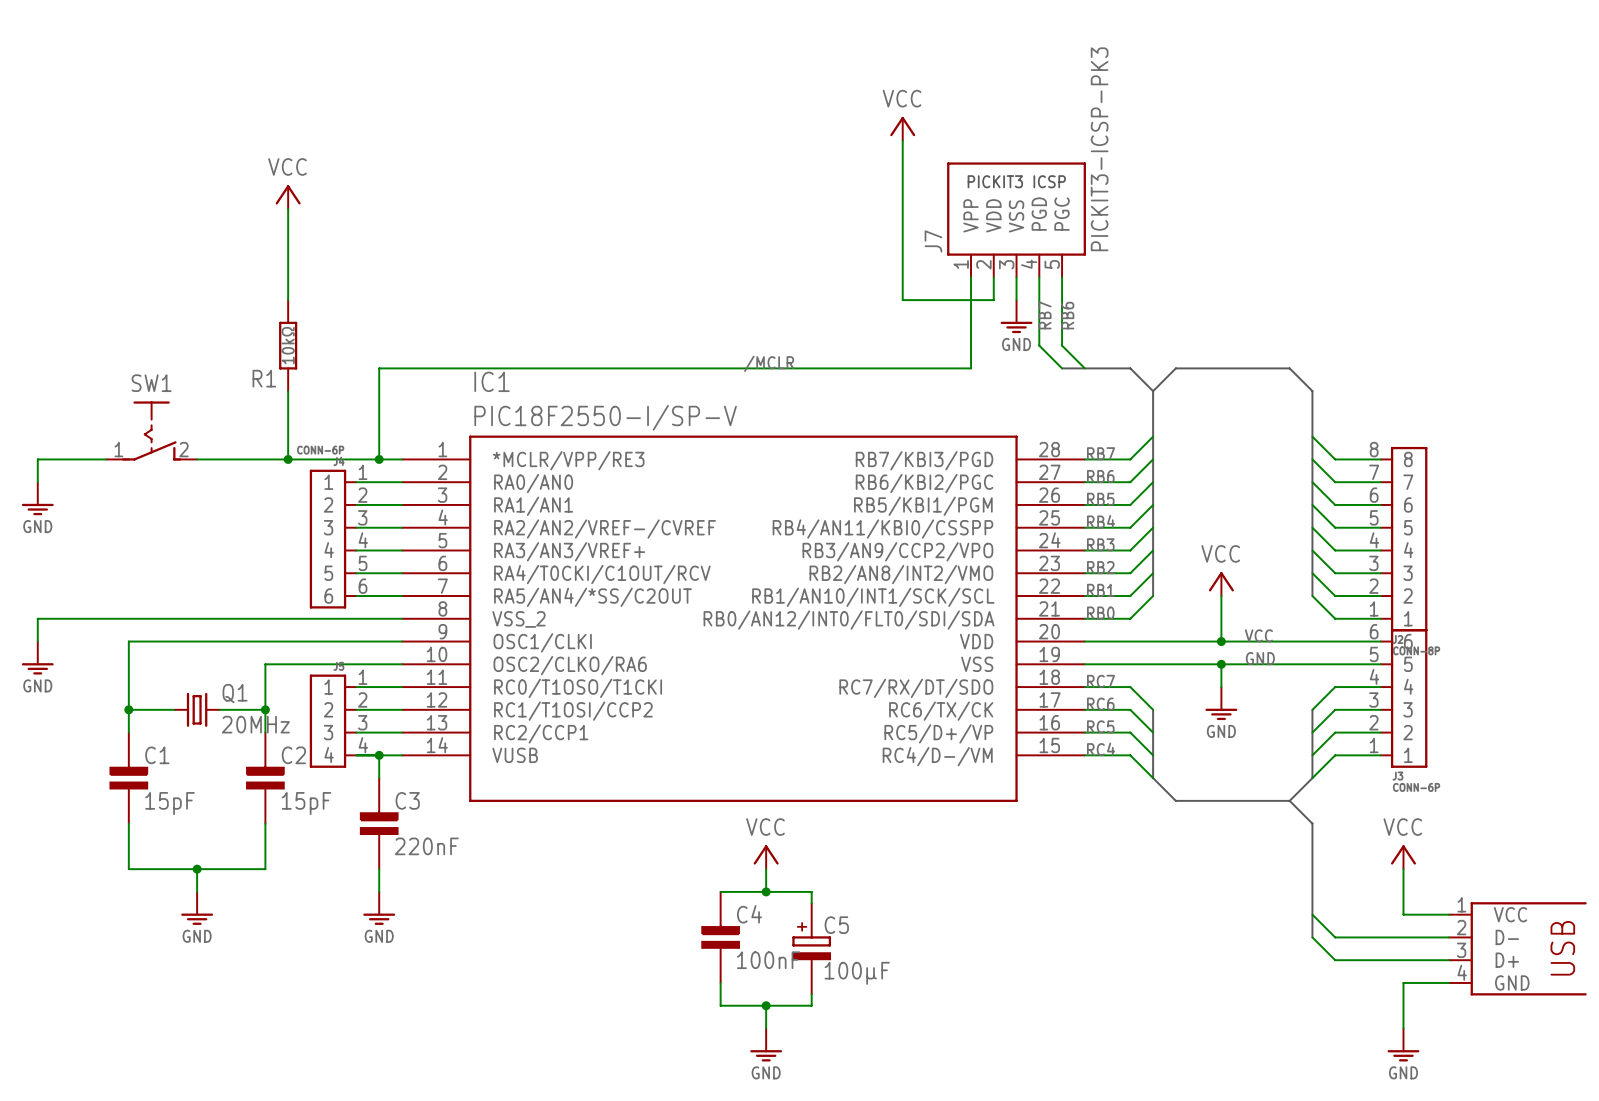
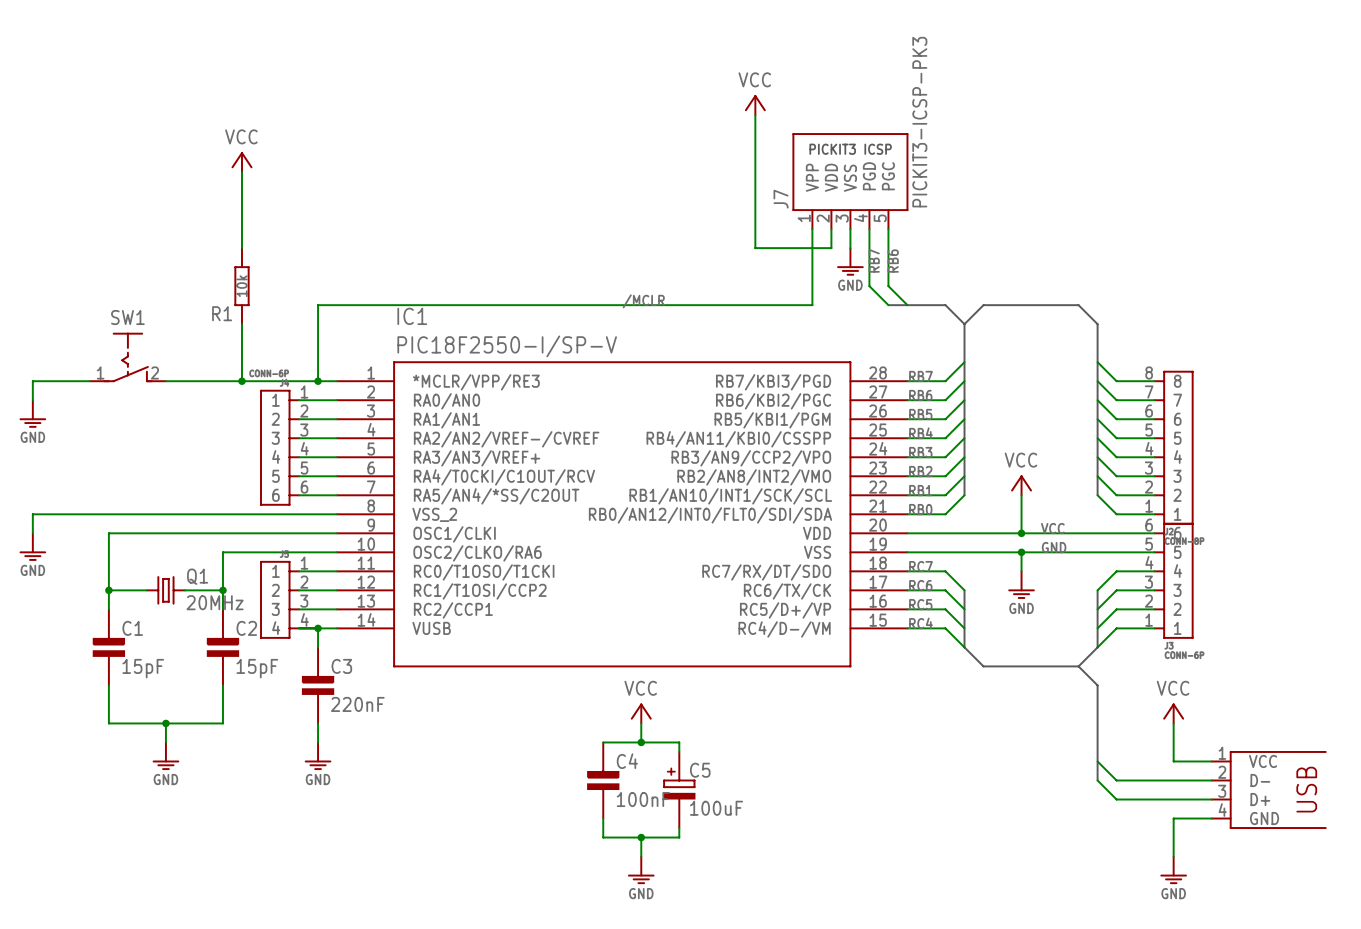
R1 value: 10kΩ (288, 345) -> 10k (241, 286)
C5 value: 100μF (857, 973) -> 100uF (716, 808)

